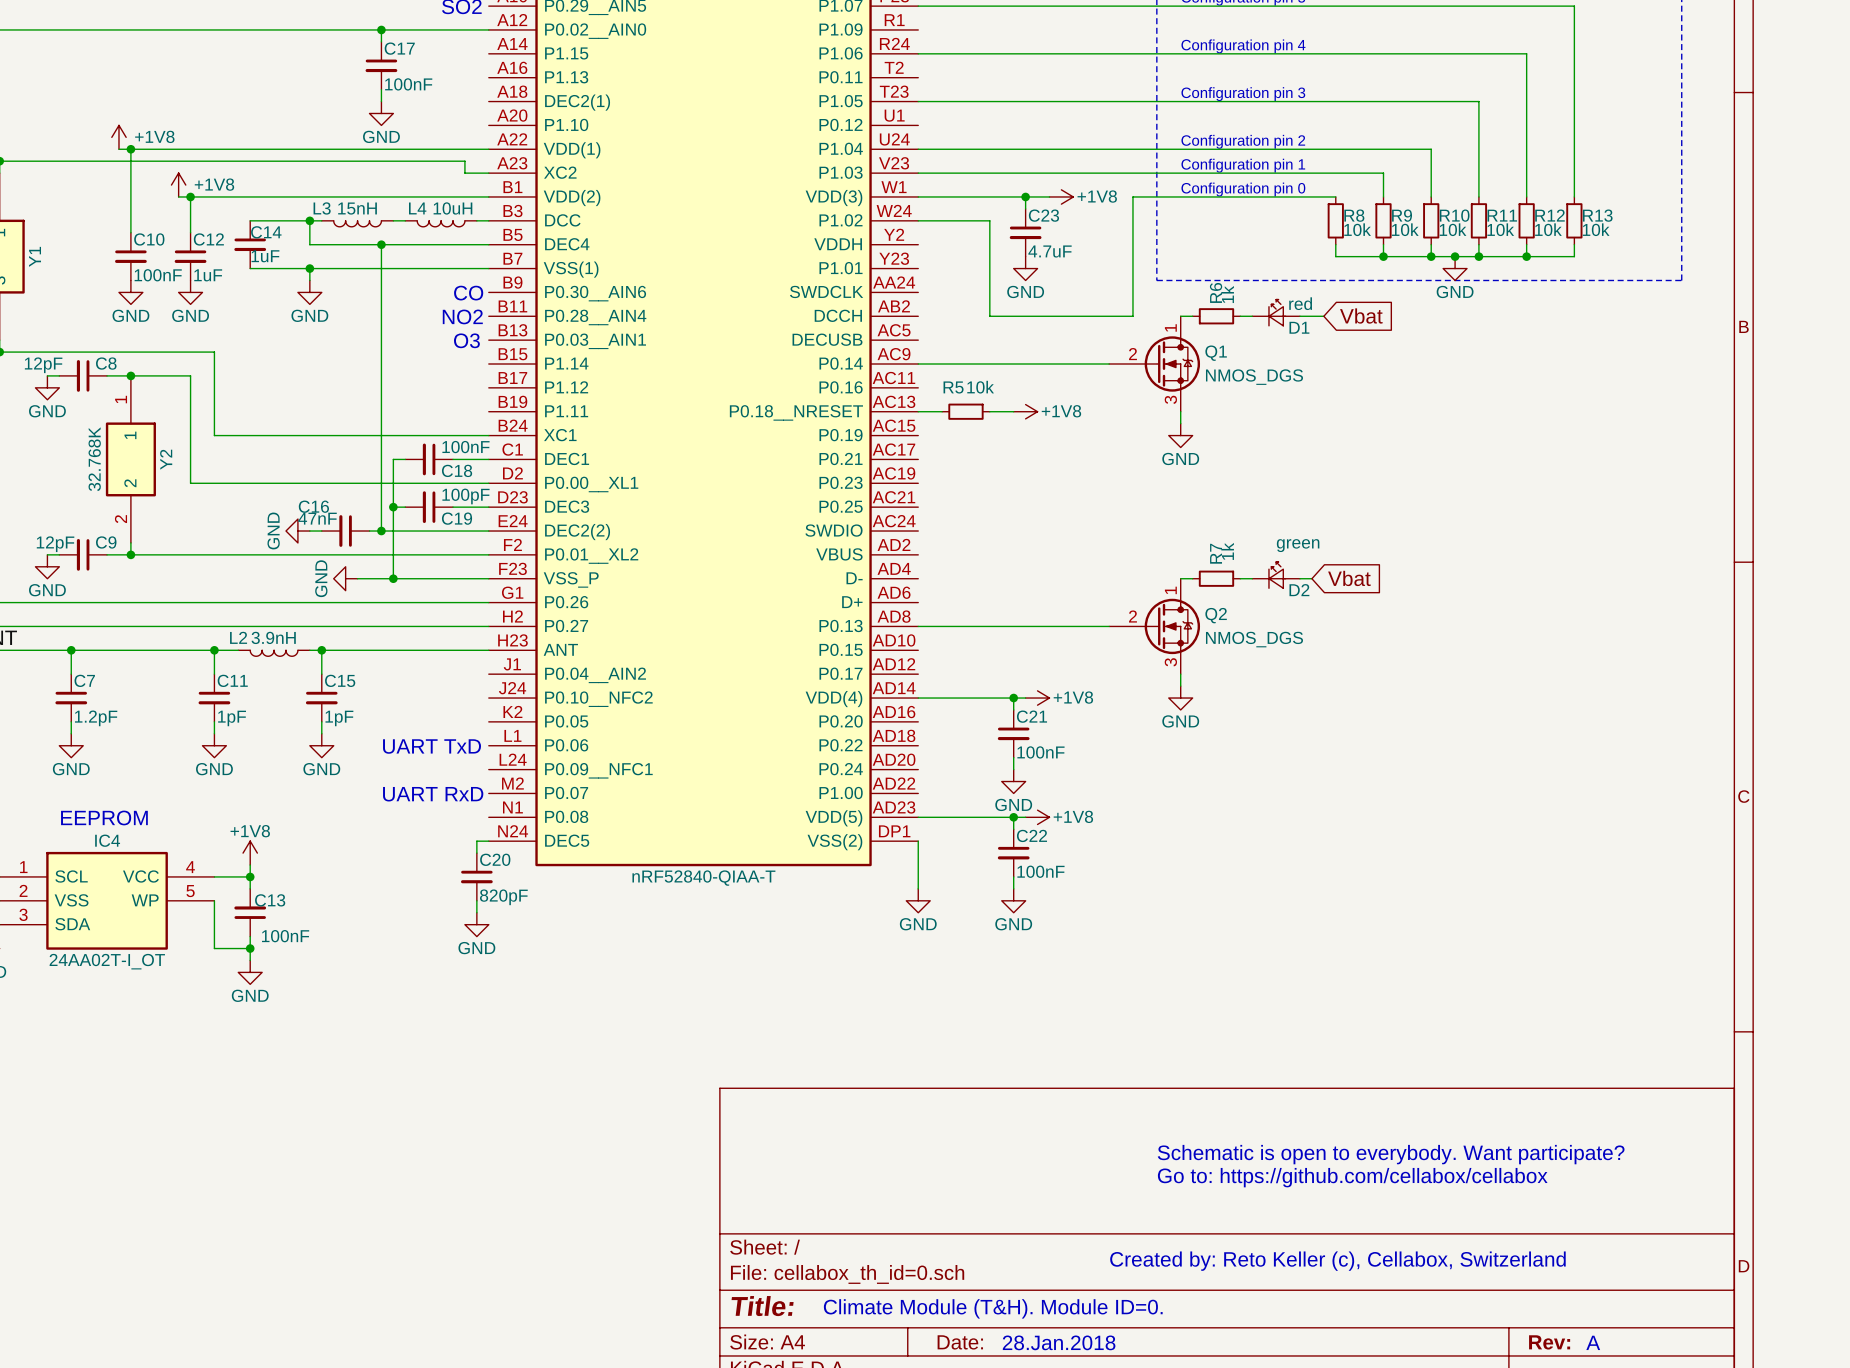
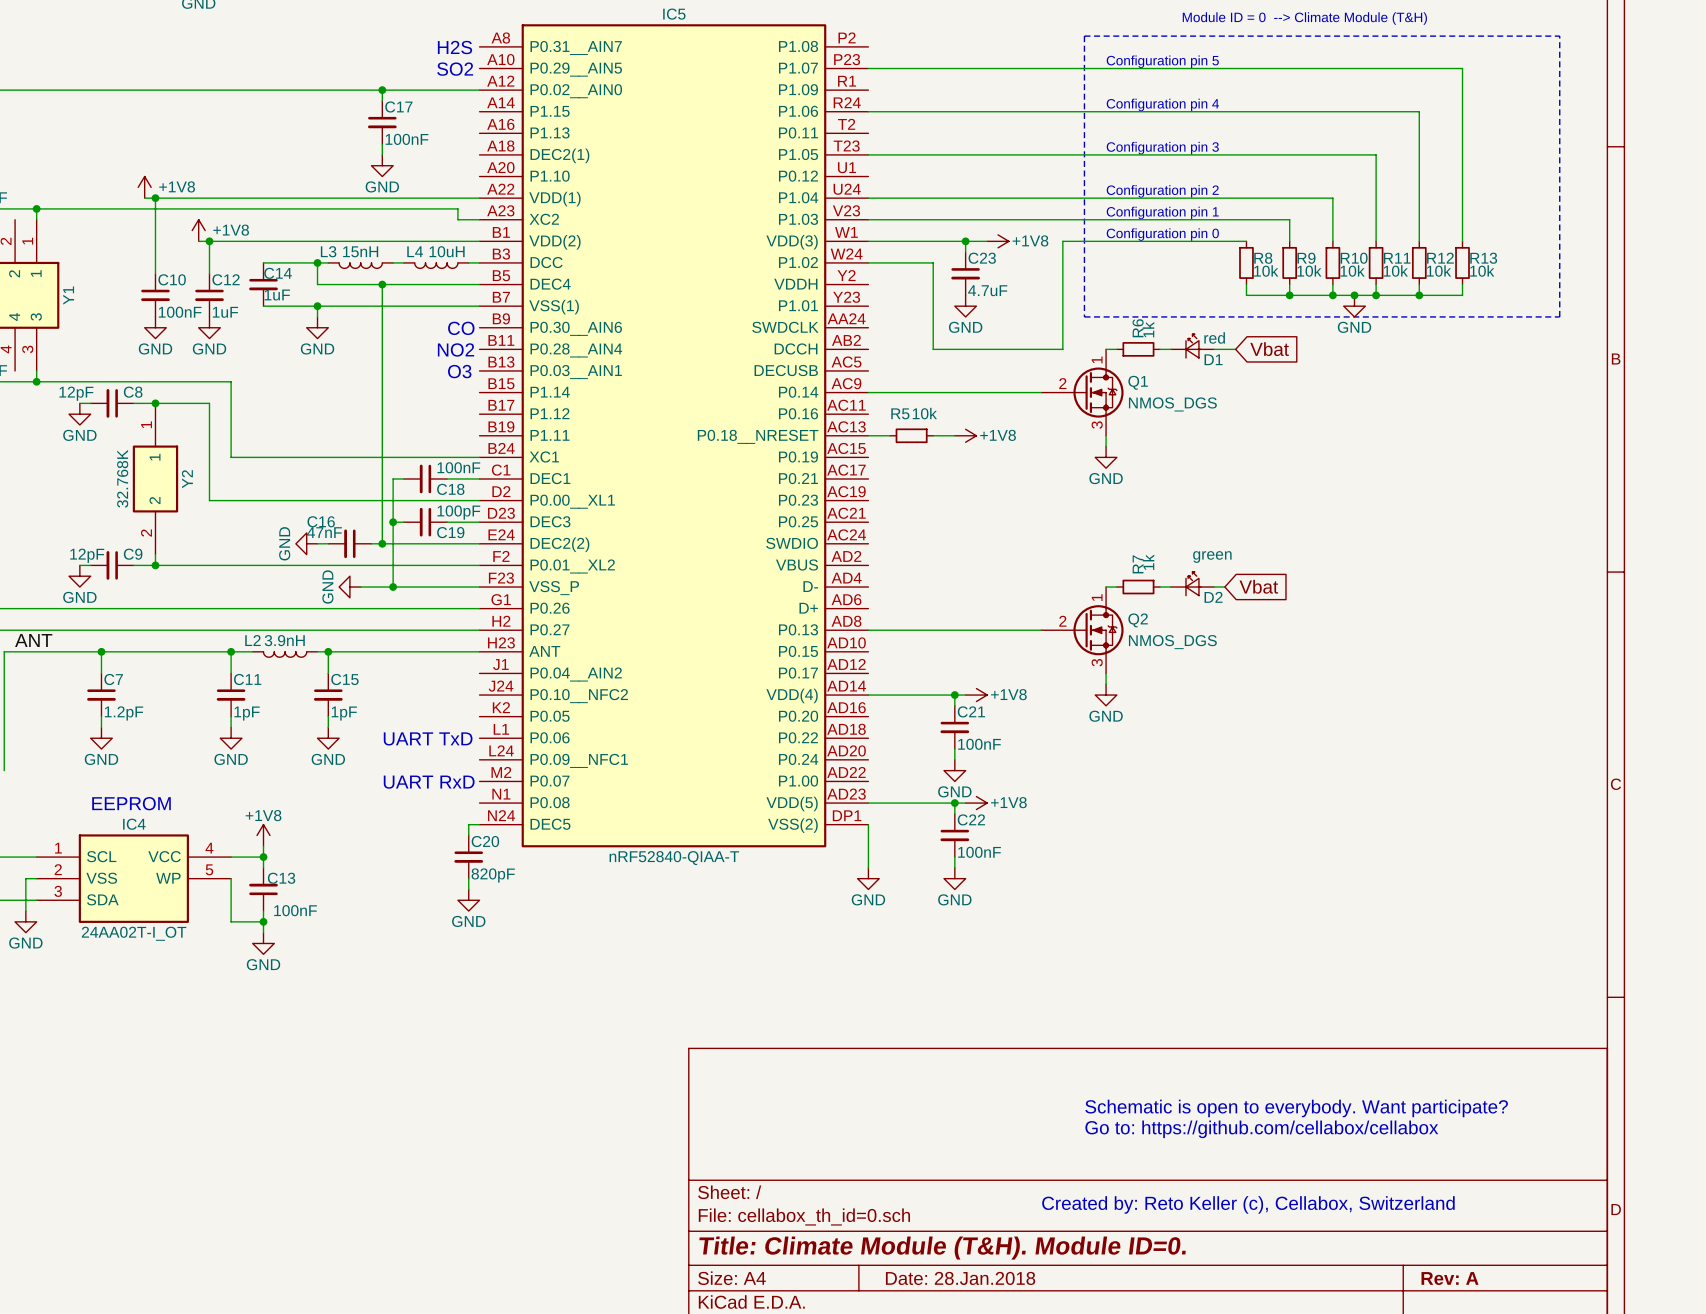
title block: Title: (762, 1306) -> Title: Climate Module (T&H). Module ID=0. (942, 1248)
text: Climate Module (T&H). Module ID=0. (993, 1308) -> none
title block: Date: (960, 1342) -> Date: 28.Jan.2018 (960, 1278)
text: 28.Jan.2018 (1059, 1342) -> none
title block: Rev: (1549, 1342) -> Rev: A (1450, 1278)
text: A (1593, 1342) -> none

